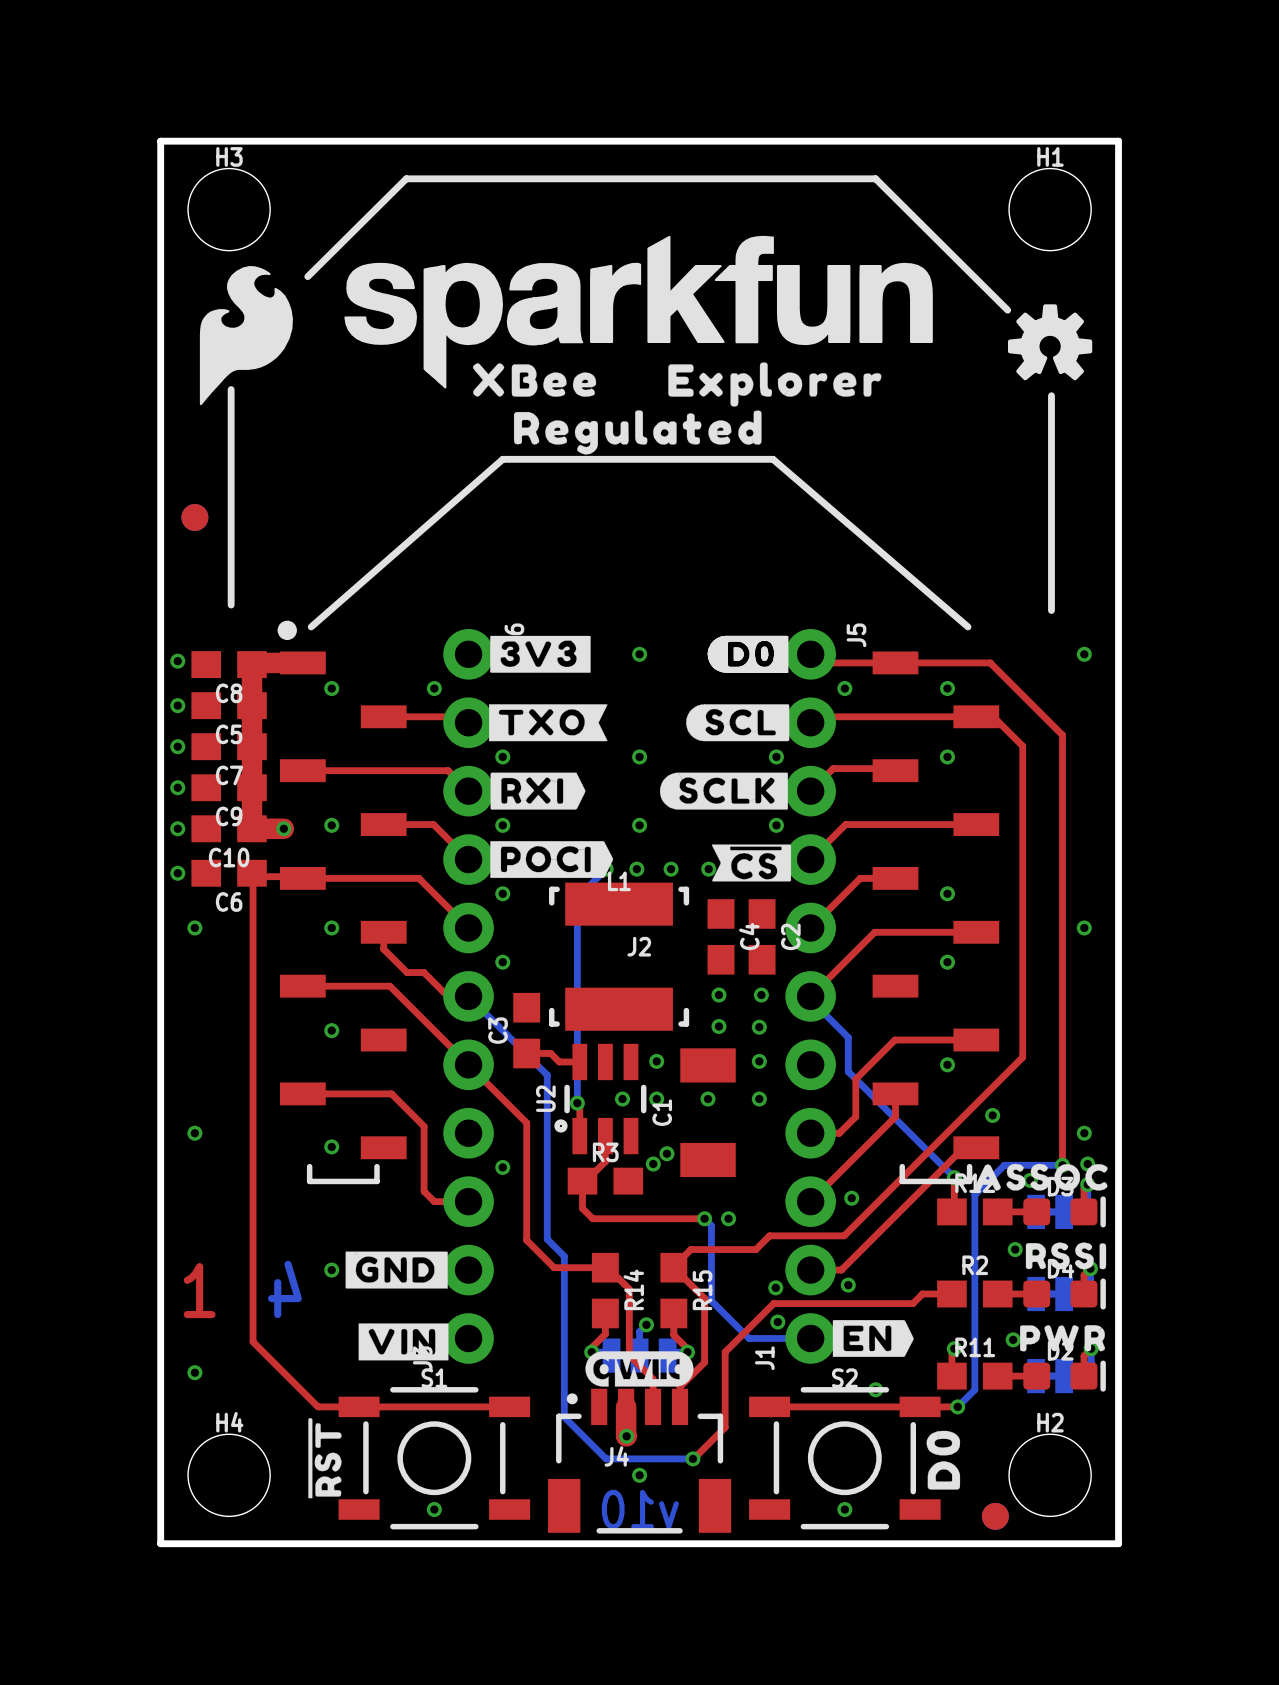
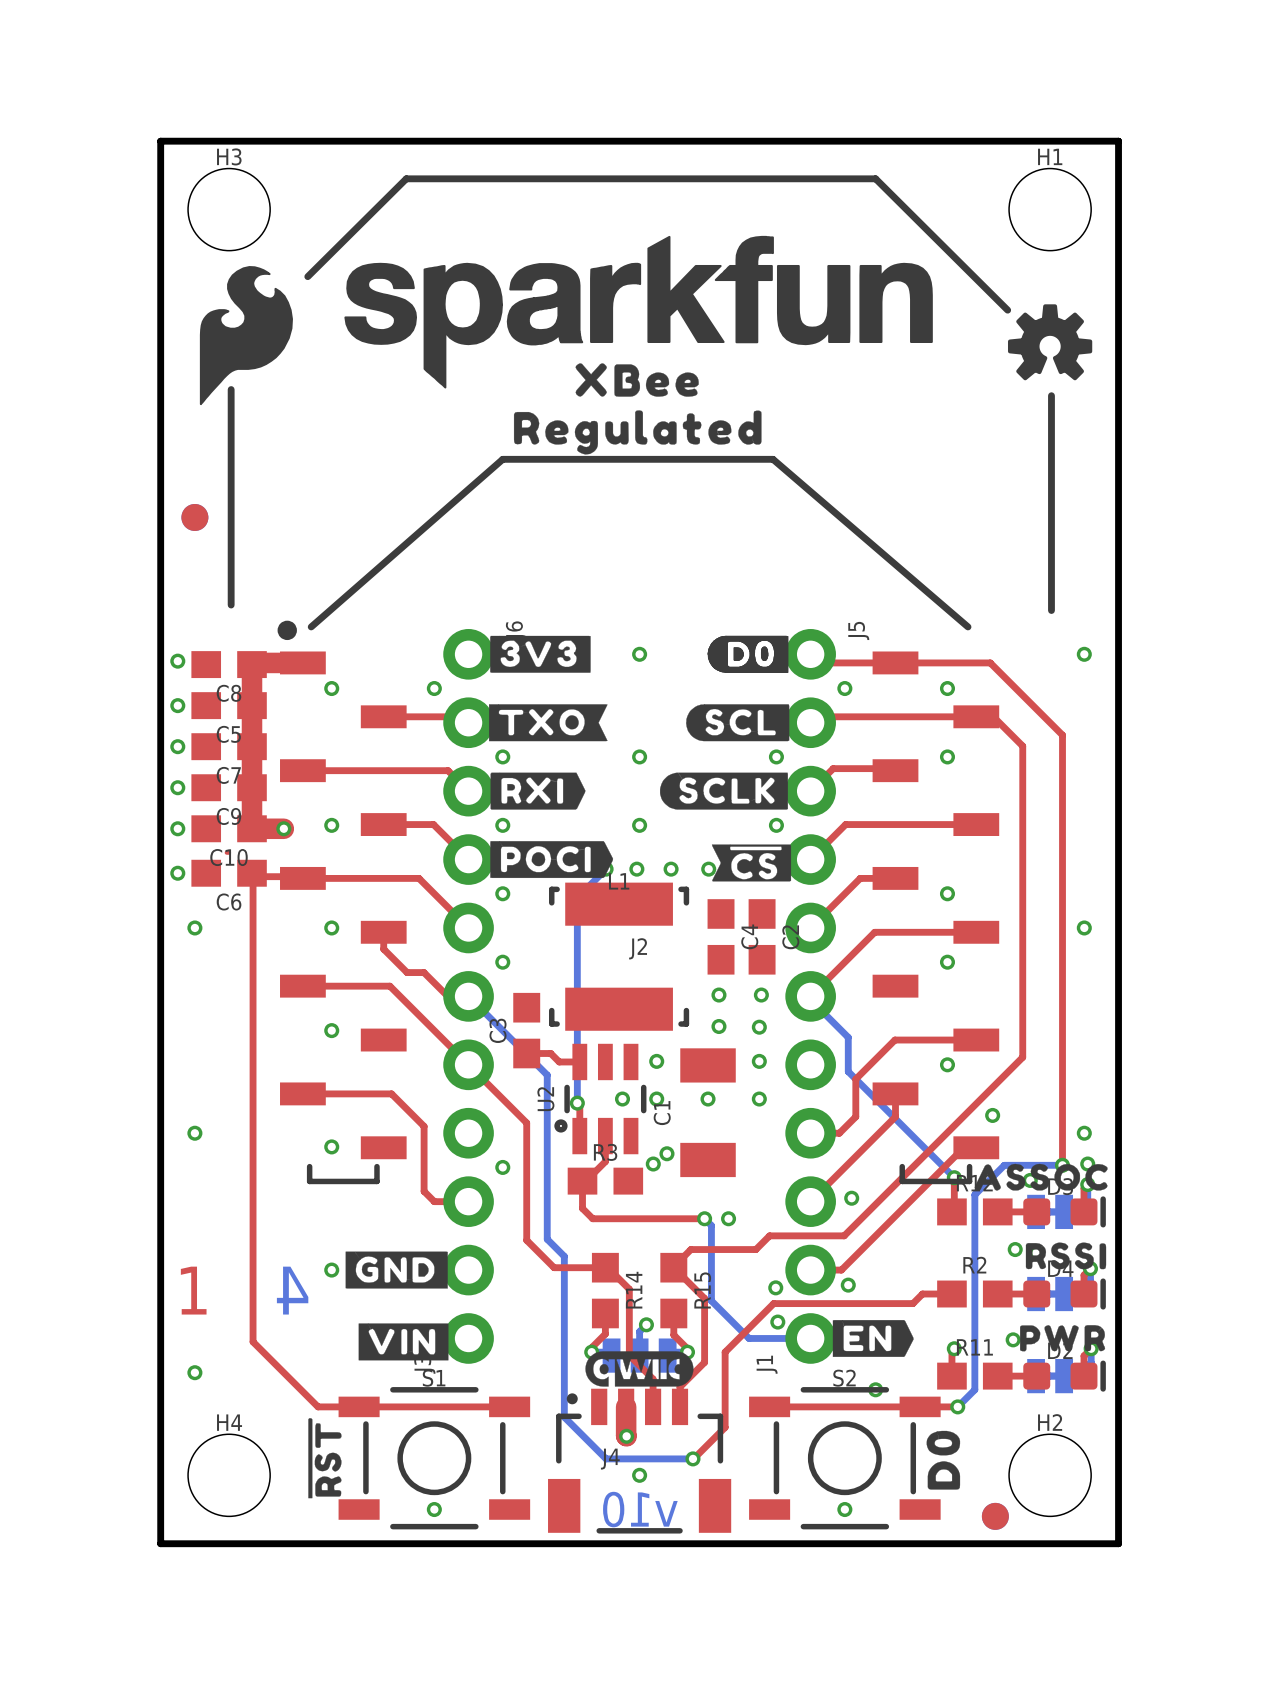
drawing: [668, 362, 882, 407] -> none
drawing position: (534, 379) -> (637, 379)

